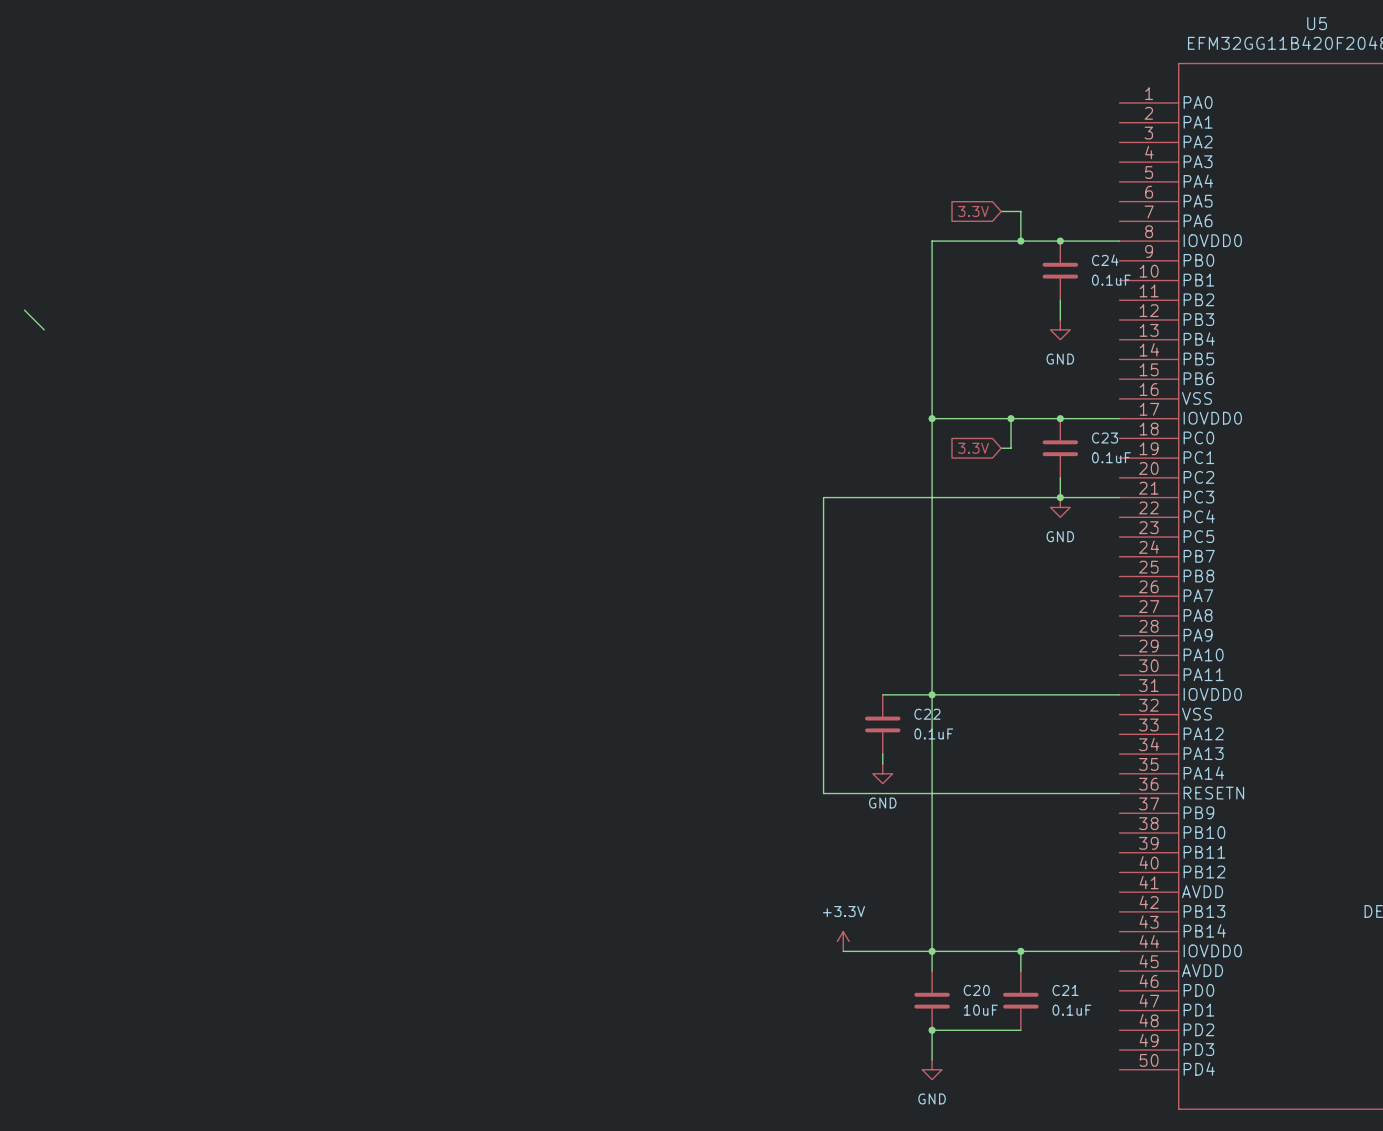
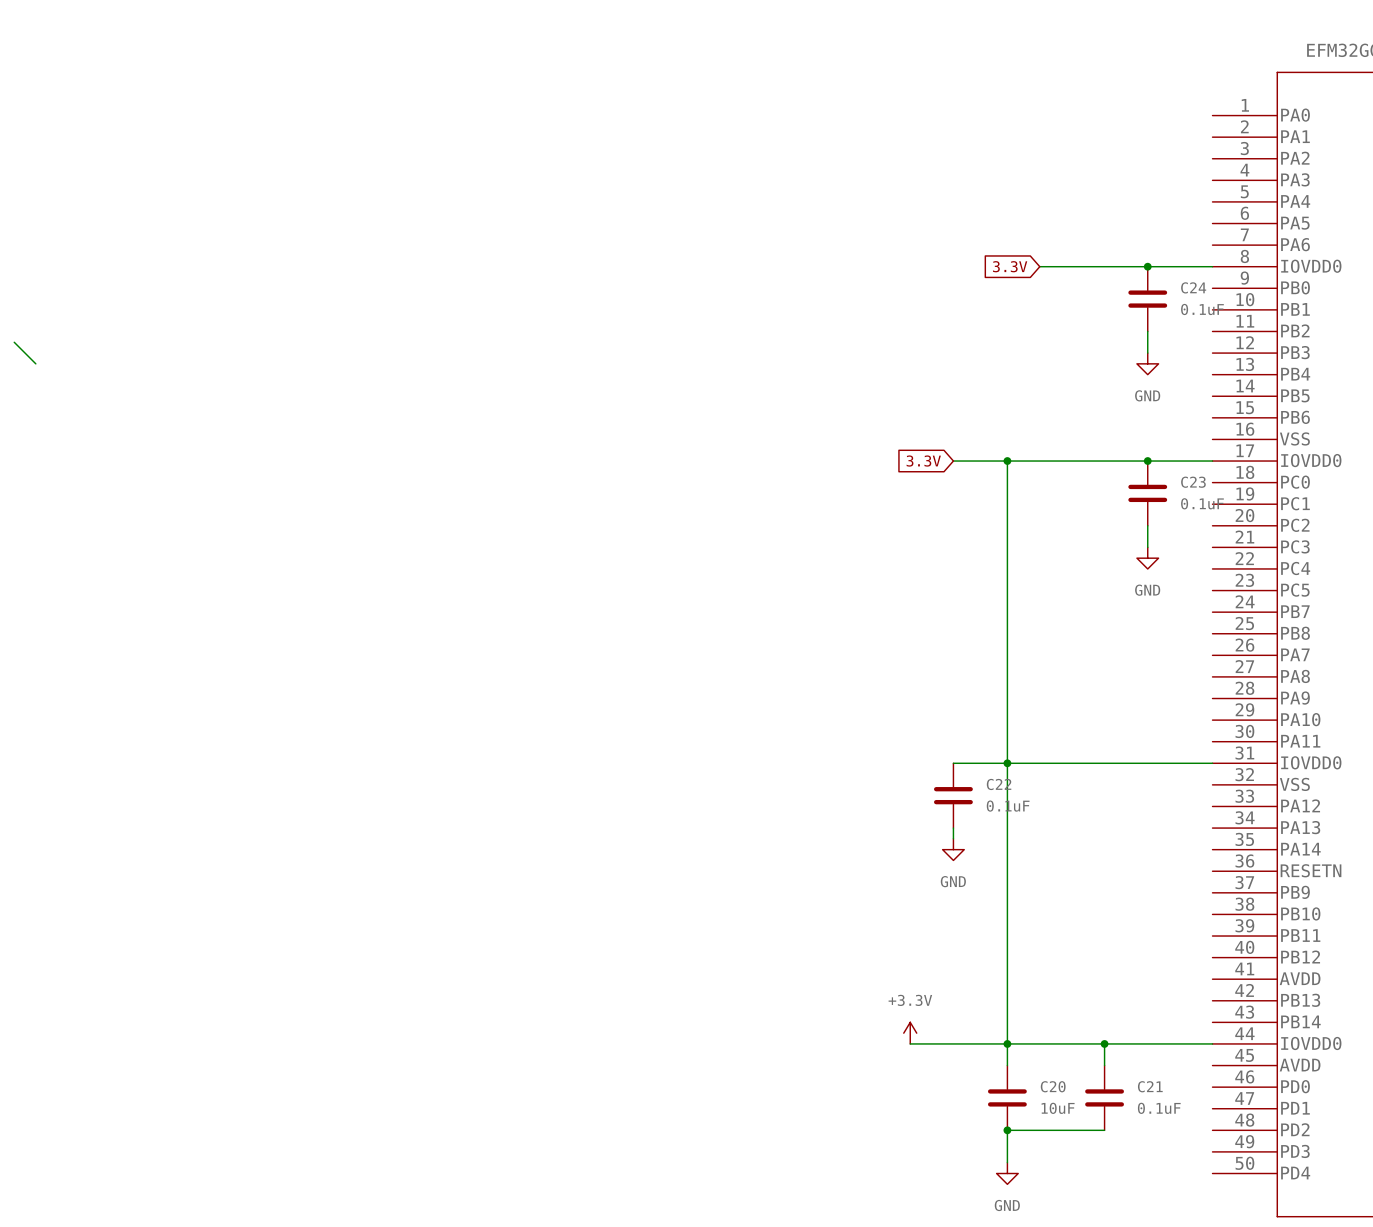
global label position: 3.3V (973, 211) -> 3.3V (1010, 266)
wire: (1001, 211) (1020, 211) (1020, 241) -> none
wire: (961, 241) (932, 241) (932, 418) -> (953, 461) (1007, 461)
junction: (1020, 241) -> none
global label: none -> 3.3V (923, 461)
wire: (1011, 418) (1011, 448) (1001, 448) -> none
junction: (1011, 418) -> none
global label: 3.3V (973, 448) -> none
junction: (1060, 497) -> none
wire: (1119, 497) (823, 497) (823, 793) (1119, 793) -> none

